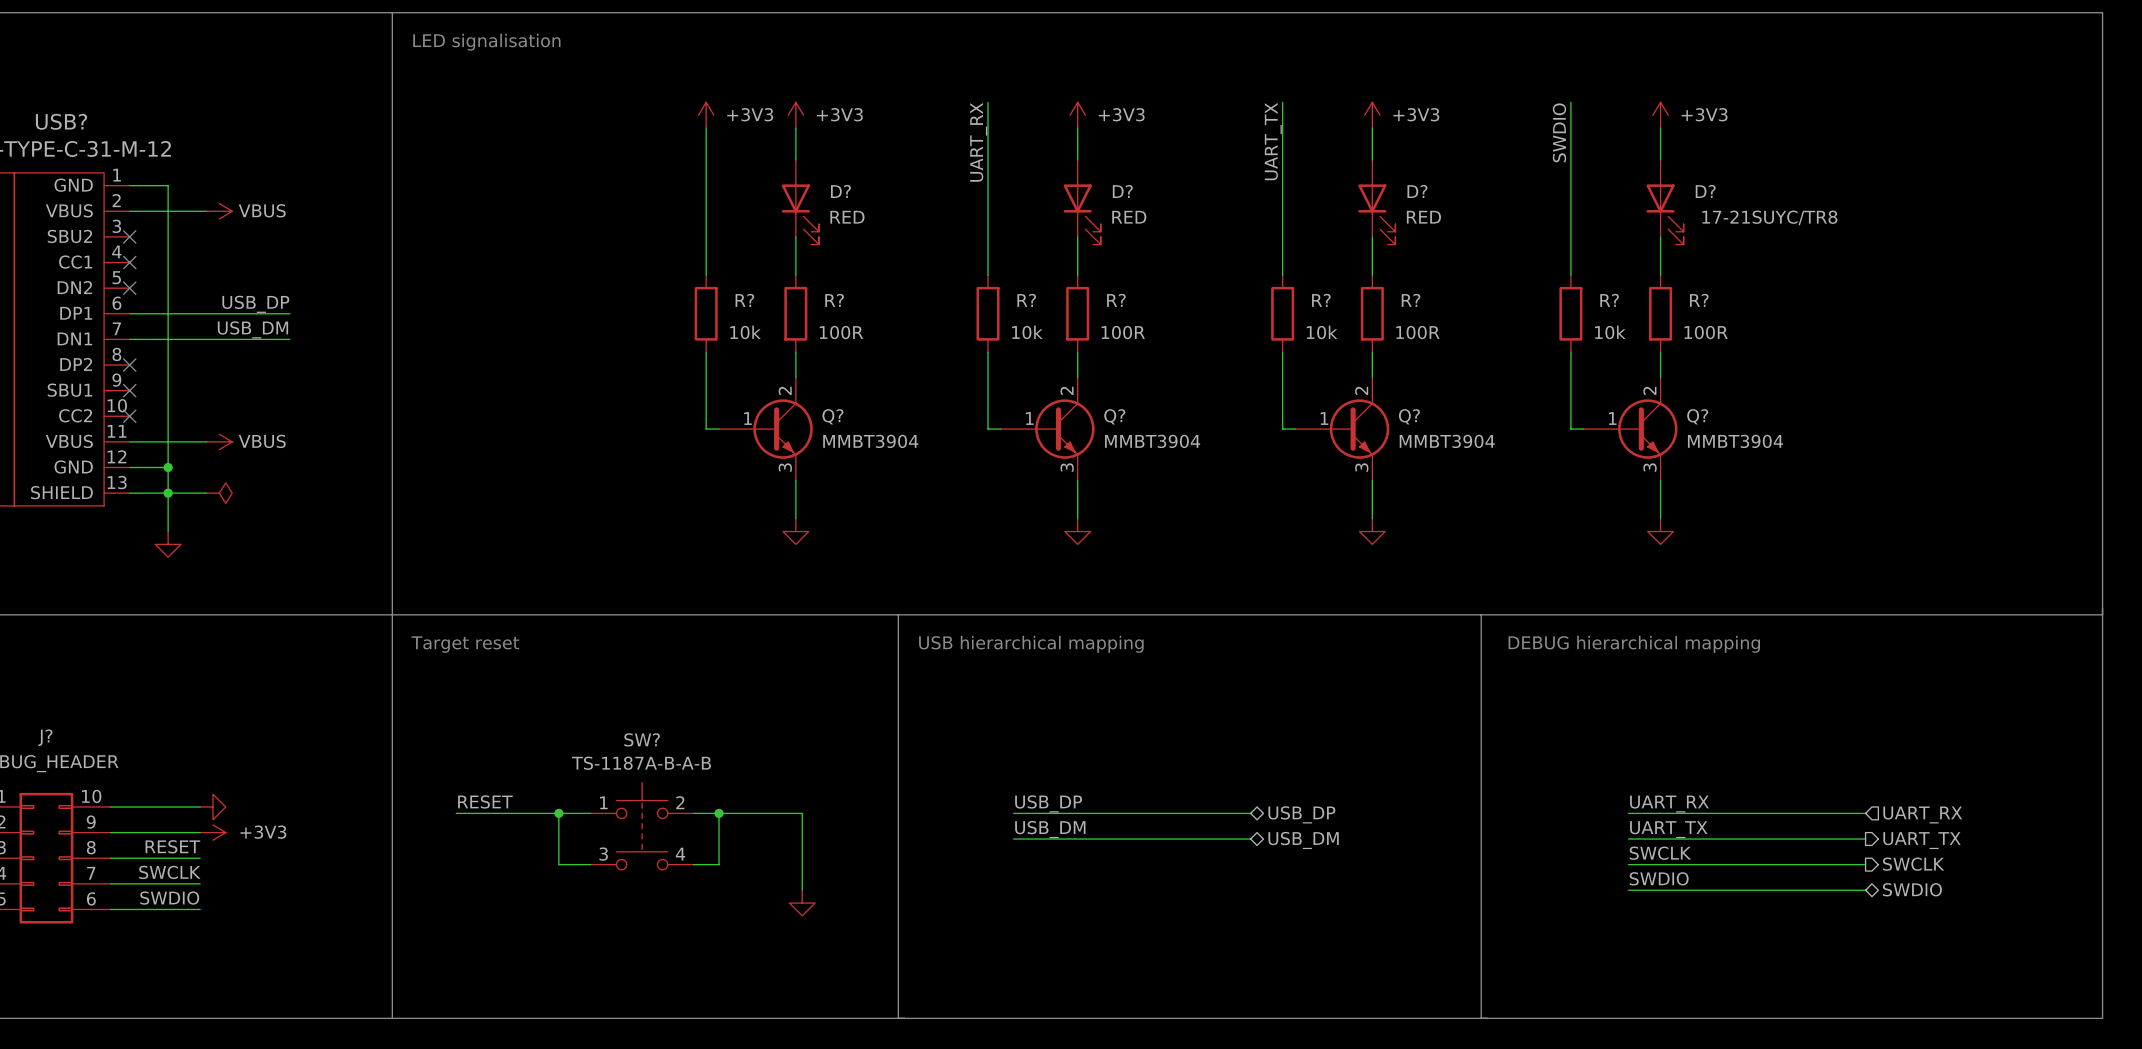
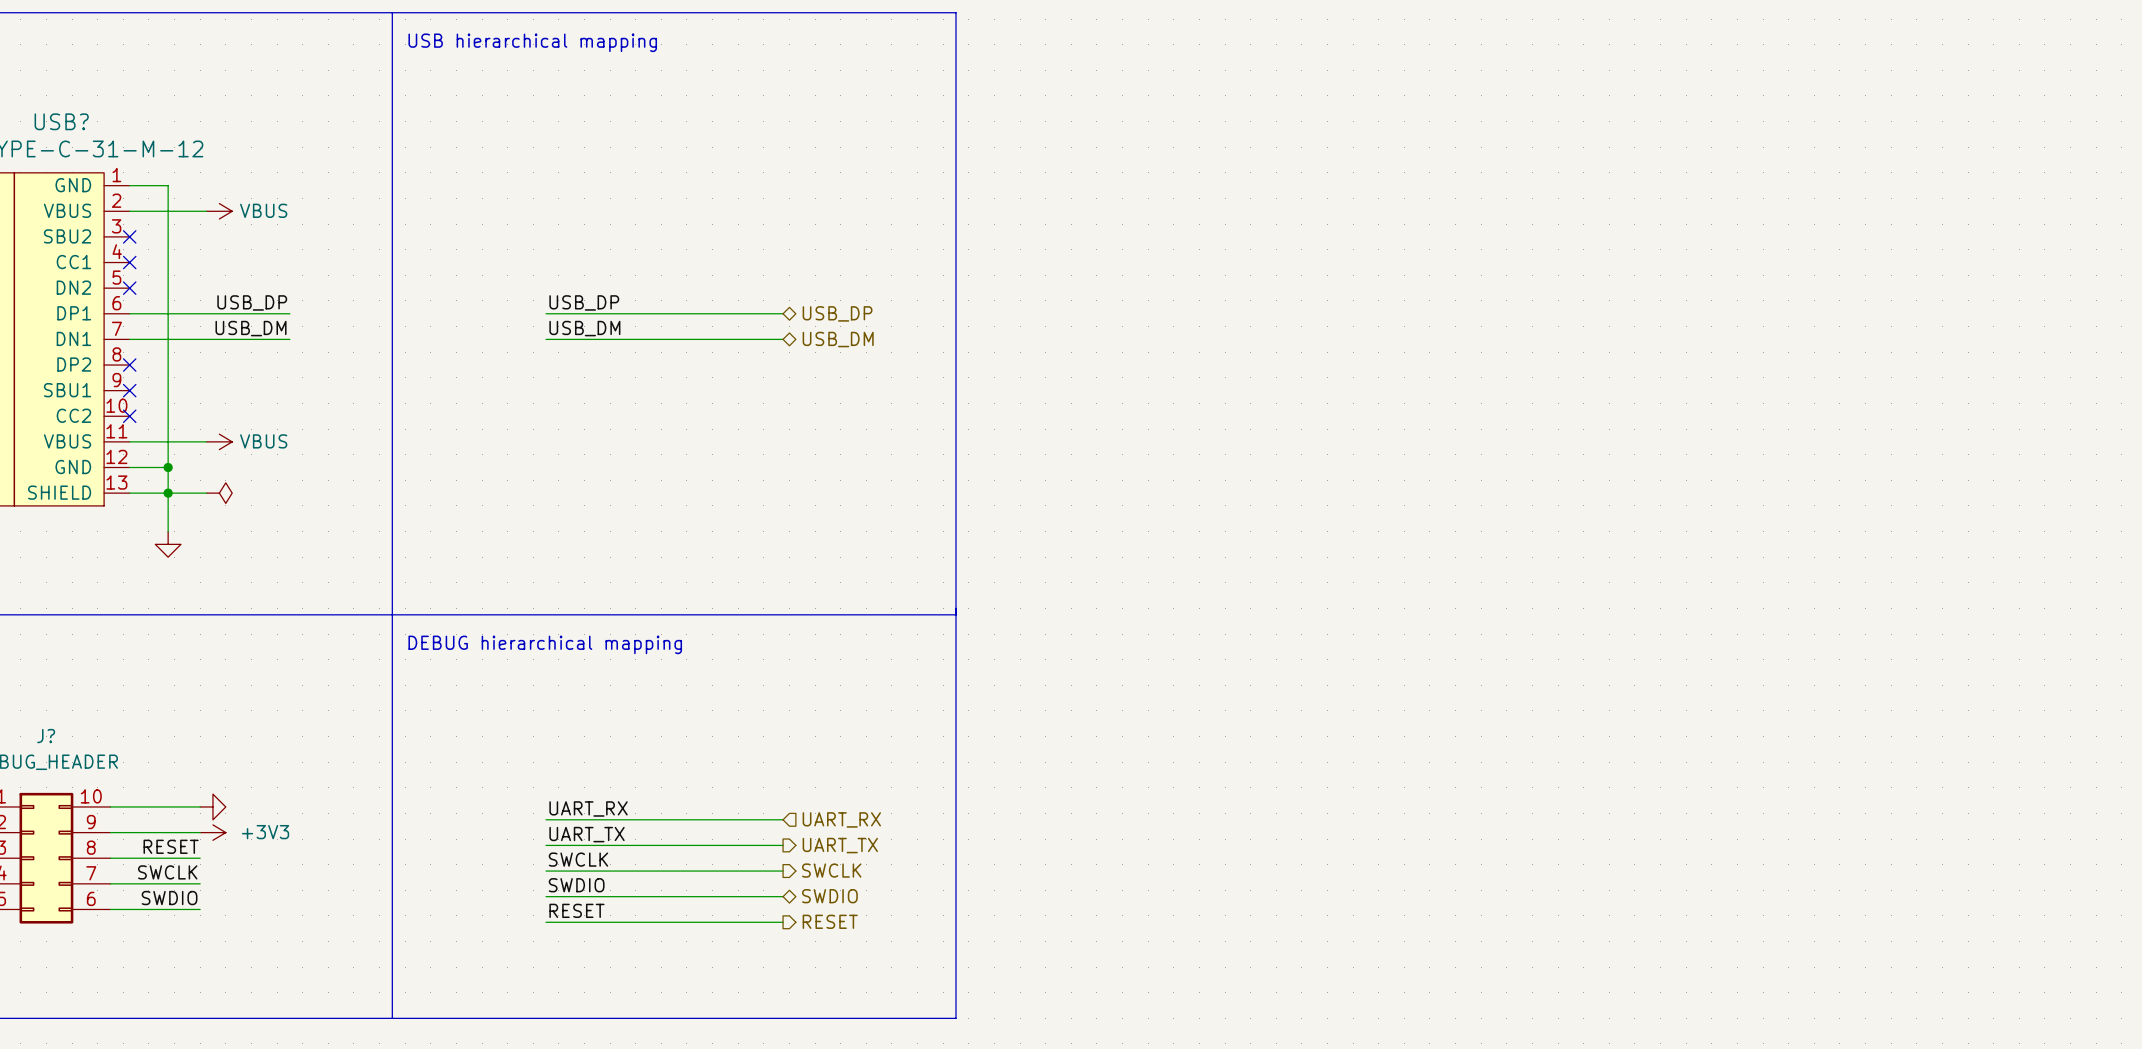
line: (956, 12) (2102, 12) (2102, 1018) (956, 1018) -> (956, 12) (956, 1018)
text: LED signalisation (486, 42) -> USB hierarchical mapping (532, 42)
wire: (988, 102) (988, 275) -> none
wire: (1282, 102) (1282, 275) -> none
wire: (1570, 102) (1570, 275) -> none
power symbol: +3V3 (706, 115) -> none
power symbol: +3V3 (795, 115) -> none
power symbol: +3V3 (1077, 115) -> none
power symbol: +3V3 (1372, 115) -> none
power symbol: +3V3 (1660, 115) -> none
wire: (706, 128) (706, 275) -> none
wire: (795, 128) (795, 160) -> none
wire: (1077, 128) (1077, 160) -> none
wire: (1372, 128) (1372, 160) -> none
wire: (1660, 128) (1660, 160) -> none
label: SWDIO (1559, 132) -> none
label: UART_TX (1273, 141) -> none
label: UART_RX (978, 142) -> none
D?: RED (800, 202) -> none
D?: RED (1082, 202) -> none
D?: RED (1376, 202) -> none
D?: 17-21SUYC/TR8 (1665, 202) -> none
wire: (795, 236) (795, 275) -> none
wire: (1077, 236) (1077, 275) -> none
wire: (1372, 236) (1372, 275) -> none
wire: (1660, 236) (1660, 275) -> none
label: none -> USB_DP (584, 302)
wire: none -> (546, 313) (783, 313)
R?: 10k (706, 313) -> none
R?: 100R (795, 313) -> none
R?: 10k (988, 313) -> none
R?: 100R (1077, 313) -> none
R?: 10k (1282, 313) -> none
R?: 100R (1372, 313) -> none
R?: 10k (1570, 313) -> none
R?: 100R (1660, 313) -> none
hierarchical label: none -> USB_DP (837, 313)
label: none -> USB_DM (584, 328)
wire: none -> (546, 339) (783, 339)
hierarchical label: none -> USB_DM (838, 339)
wire: (706, 352) (706, 429) (719, 429) -> none
wire: (795, 352) (795, 377) -> none
wire: (988, 352) (988, 429) (1000, 429) -> none
wire: (1077, 352) (1077, 377) -> none
wire: (1282, 352) (1282, 429) (1295, 429) -> none
wire: (1372, 352) (1372, 377) -> none
wire: (1570, 352) (1570, 429) (1583, 429) -> none
wire: (1660, 352) (1660, 377) -> none
Q?: MMBT3904 (765, 429) -> none
Q?: MMBT3904 (1047, 429) -> none
Q?: MMBT3904 (1342, 429) -> none
Q?: MMBT3904 (1630, 429) -> none
wire: (795, 480) (795, 518) -> none
wire: (1077, 480) (1077, 518) -> none
wire: (1372, 480) (1372, 518) -> none
wire: (1660, 480) (1660, 518) -> none
power symbol: (795, 531) -> none
power symbol: (1077, 531) -> none
power symbol: (1372, 531) -> none
power symbol: (1660, 531) -> none
line: (898, 614) (898, 1018) -> none
line: (956, 614) (2102, 614) -> none
line: (1481, 614) (1481, 1018) -> none
text: Target reset (465, 644) -> DEBUG hierarchical mapping (545, 644)
text: USB hierarchical mapping (1031, 644) -> none
text: DEBUG hierarchical mapping (1634, 644) -> none
label position: RESET (485, 801) -> RESET (576, 910)
label: USB_DP (1048, 803) -> none
label: UART_RX (1669, 804) -> none
label: none -> UART_RX (588, 808)
wire: (456, 813) (590, 813) -> none
wire: (558, 813) (558, 864) (590, 864) -> none
junction: (558, 813) -> none
wire: (693, 813) (802, 813) (802, 890) -> none
wire: (719, 813) (719, 864) (693, 864) -> none
junction: (719, 813) -> none
wire: (1013, 813) (1250, 813) -> none
wire: (1628, 813) (1865, 813) -> none
hierarchical label: USB_DP (1301, 814) -> none
hierarchical label: UART_RX (1922, 814) -> none
wire: none -> (546, 819) (783, 819)
hierarchical label: none -> UART_RX (841, 819)
SW?: TS-1187A-B-A-B (642, 826) -> none
label: USB_DM (1050, 829) -> none
label: UART_TX (1668, 829) -> none
label: none -> UART_TX (587, 834)
wire: (1013, 839) (1250, 839) -> none
wire: (1628, 839) (1865, 839) -> none
hierarchical label: USB_DM (1303, 840) -> none
hierarchical label: UART_TX (1922, 840) -> none
wire: none -> (546, 845) (783, 845)
hierarchical label: none -> UART_TX (840, 845)
label: SWCLK (1660, 853) -> none
label: none -> SWCLK (578, 859)
wire: (1628, 864) (1865, 864) -> none
hierarchical label: SWCLK (1913, 864) -> none
hierarchical label: none -> SWCLK (831, 870)
wire: none -> (546, 871) (783, 871)
label: SWDIO (1659, 878) -> none
label: none -> SWDIO (576, 885)
hierarchical label: SWDIO (1912, 889) -> none
wire: (1628, 890) (1865, 890) -> none
wire: none -> (546, 896) (783, 896)
hierarchical label: none -> SWDIO (829, 896)
power symbol: (802, 903) -> none
hierarchical label: none -> RESET (830, 921)
wire: none -> (546, 922) (783, 922)

